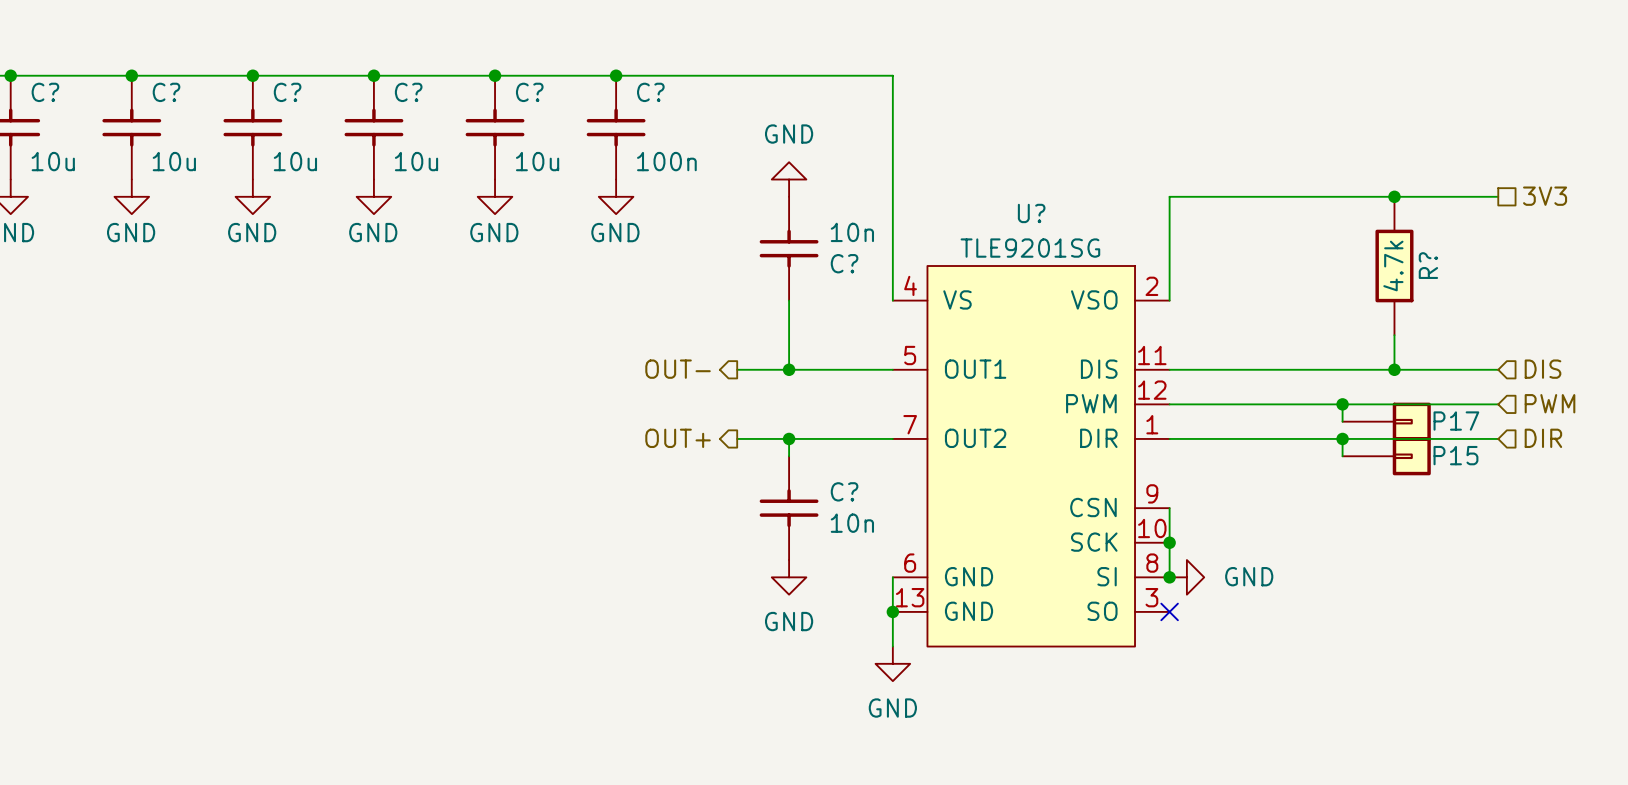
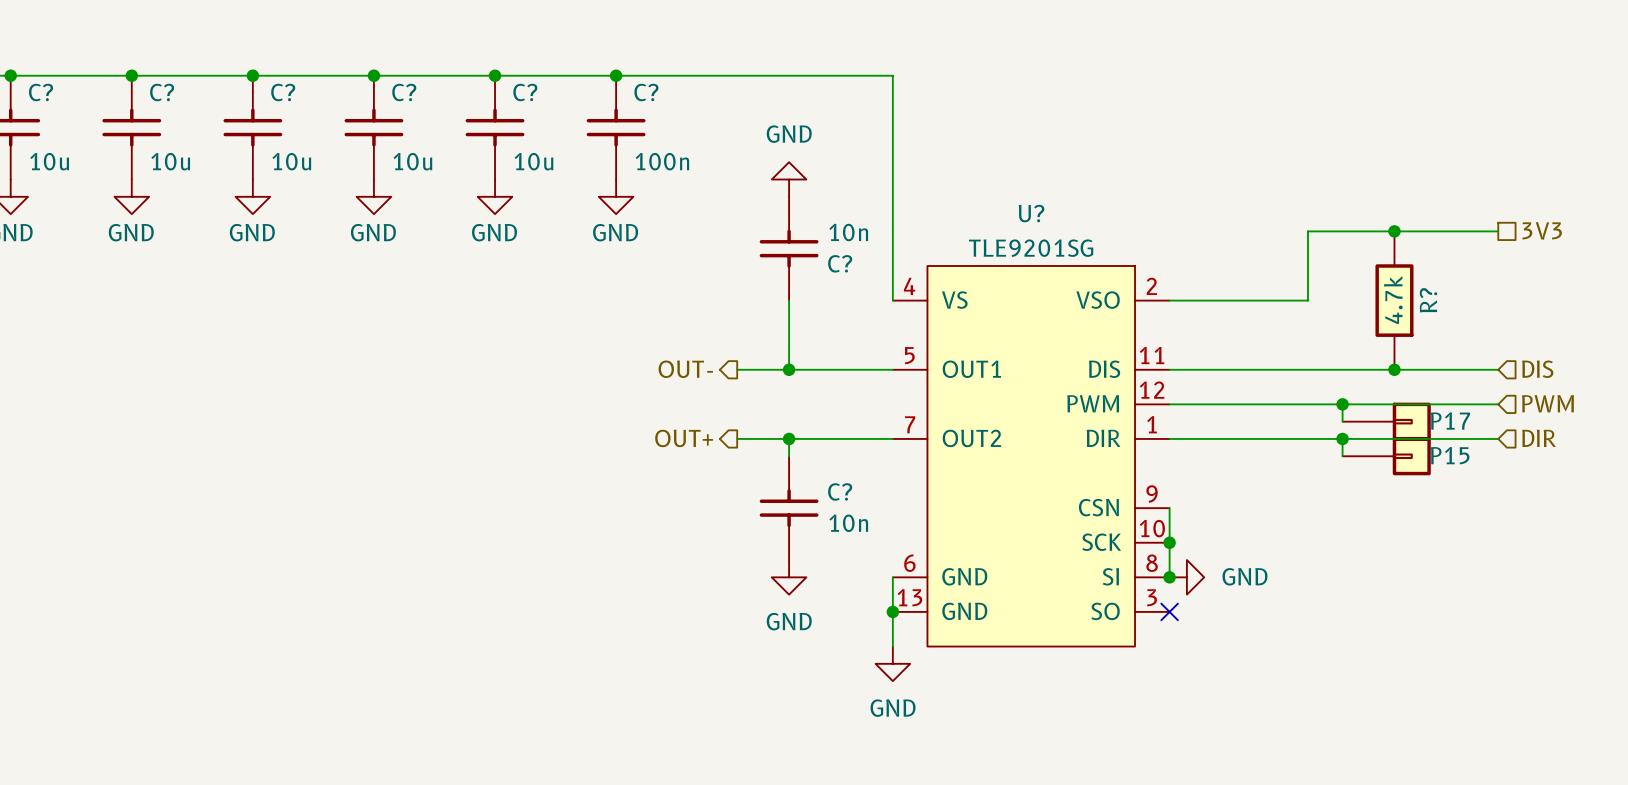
junction position: (1394, 196) -> (1394, 231)
wire: (1498, 196) (1169, 196) (1169, 300) -> (1498, 231) (1307, 231) (1307, 300) (1169, 300)
hierarchical label position: 3V3 (1545, 196) -> 3V3 (1542, 230)
R? position: (1394, 266) -> (1394, 300)

